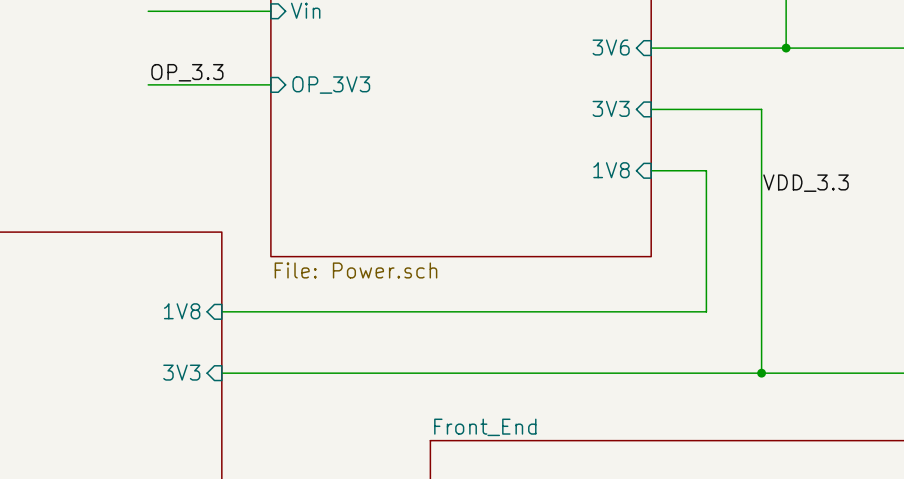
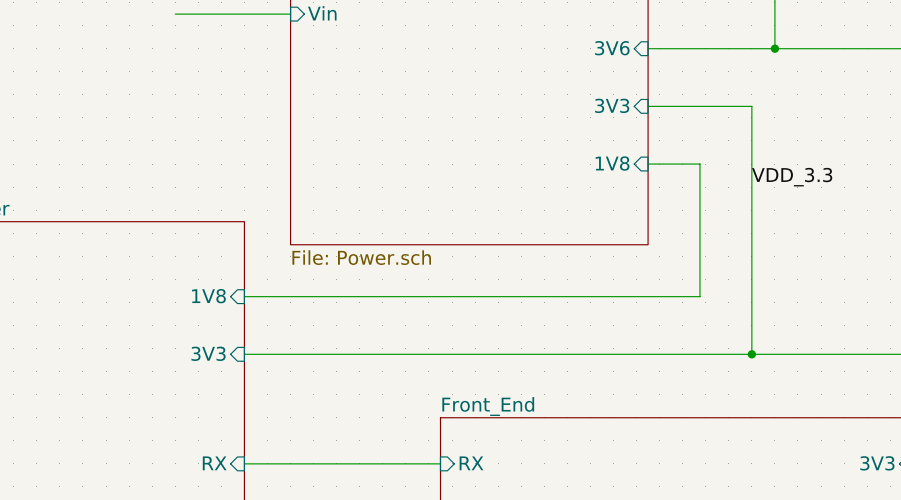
label: OP_3.3 (187, 72) -> none
wire: (148, 84) (270, 84) -> none
sheet pin: OP_3V3 (331, 85) -> none

